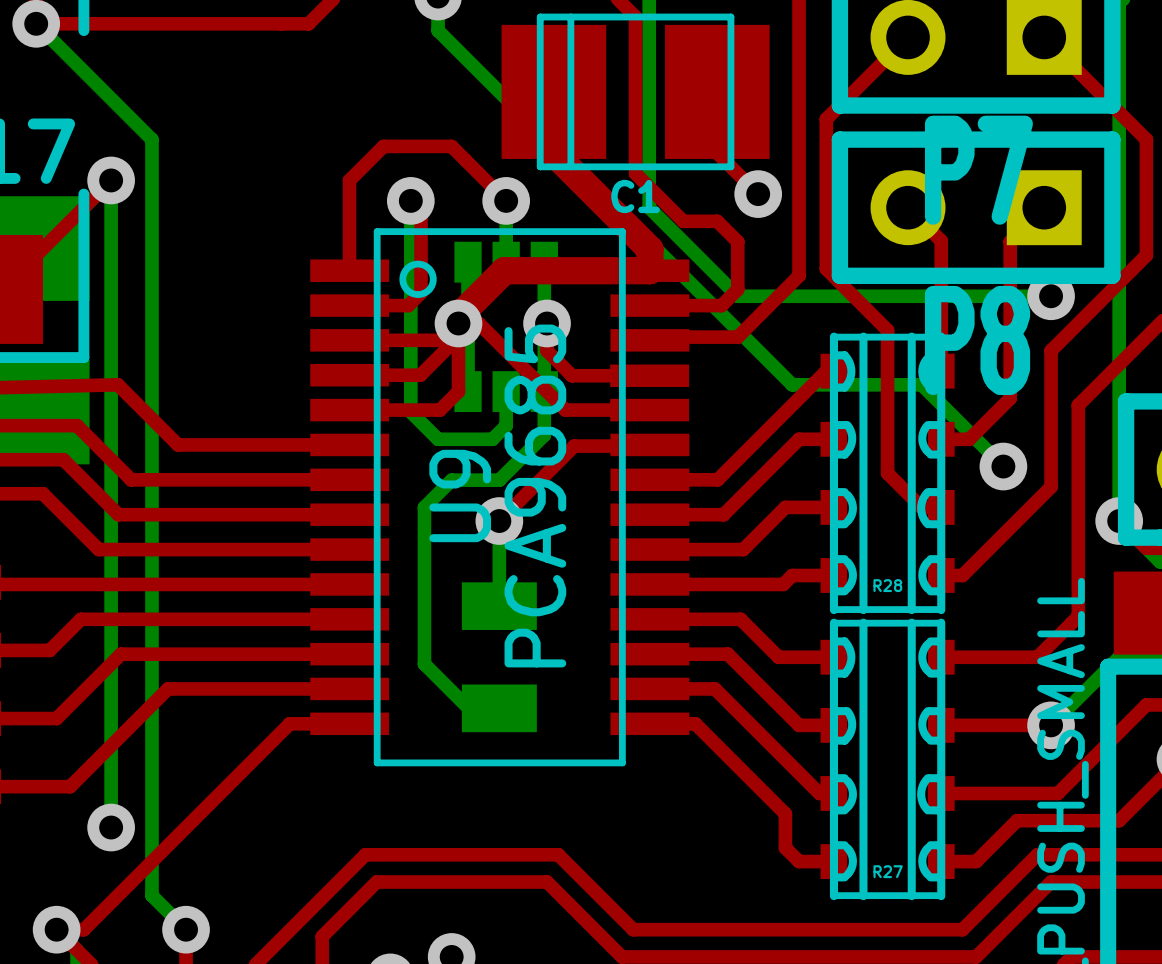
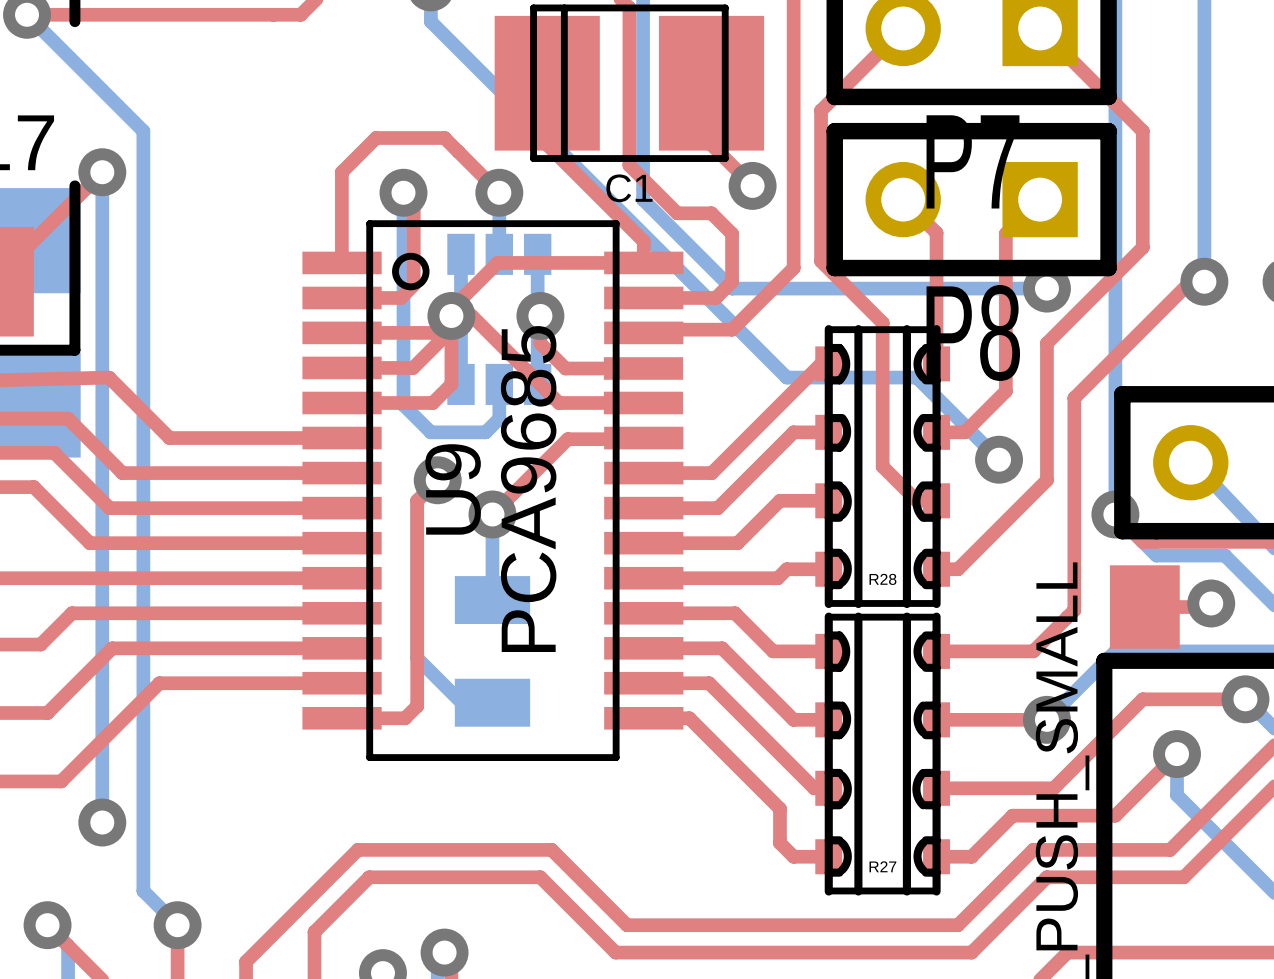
top track width: thick (553, 91) (553, 153) (649, 249) (649, 270) (504, 270) (458, 316) (458, 323) -> thin (547, 83) (547, 144) (643, 241) (643, 262) (497, 262) (451, 309) (451, 315)
bottom track: (544, 391) (544, 435) (499, 480) (451, 480) -> none
via: none -> (437, 480)
top track: (349, 723) (289, 723) (83, 929) (56, 929) -> (342, 718) (405, 718) (417, 706) (417, 500) (437, 480)

